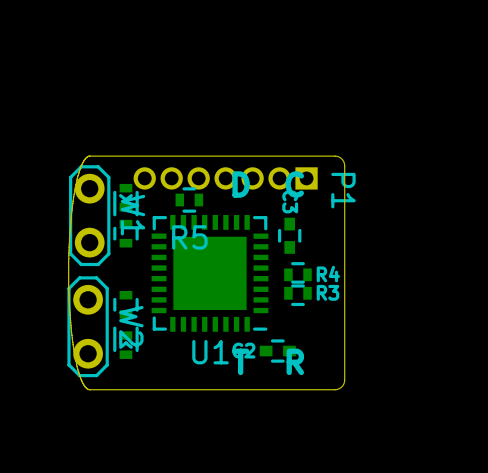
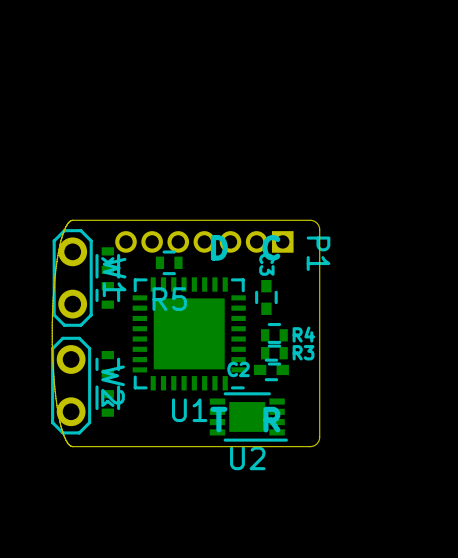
C2 position: (277, 351) -> (271, 369)
U2: none -> (248, 416)

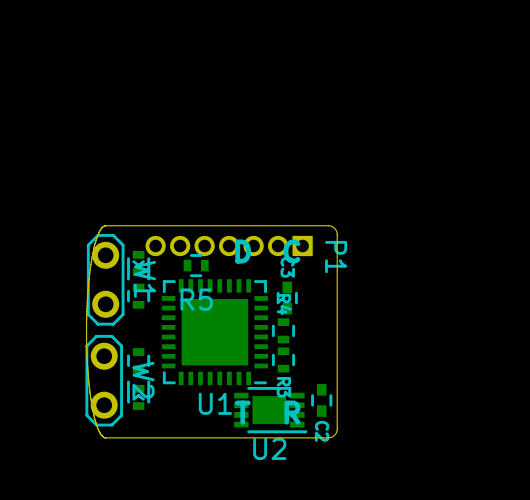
R4 rotation: 0° (274, 335) -> 90° clockwise (283, 330)
R3 rotation: 0° (274, 353) -> 90° clockwise (283, 359)
C2 name position: C2 (238, 369) -> C2 (322, 431)
C2 rotation: 0° (271, 369) -> 90° clockwise (321, 400)
C2 position: (271, 369) -> (321, 400)

